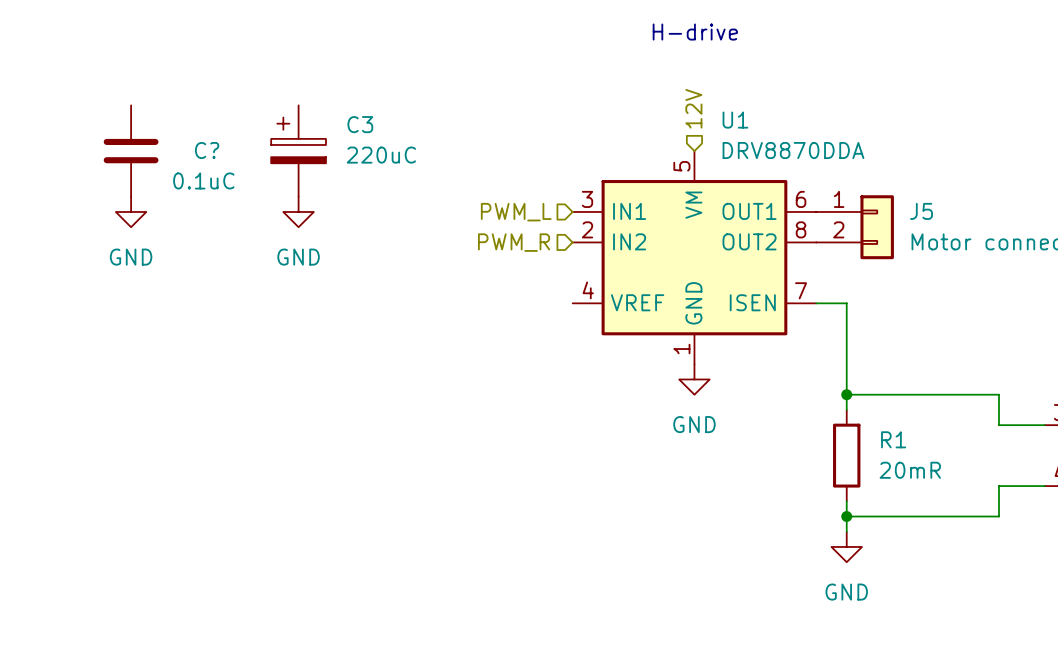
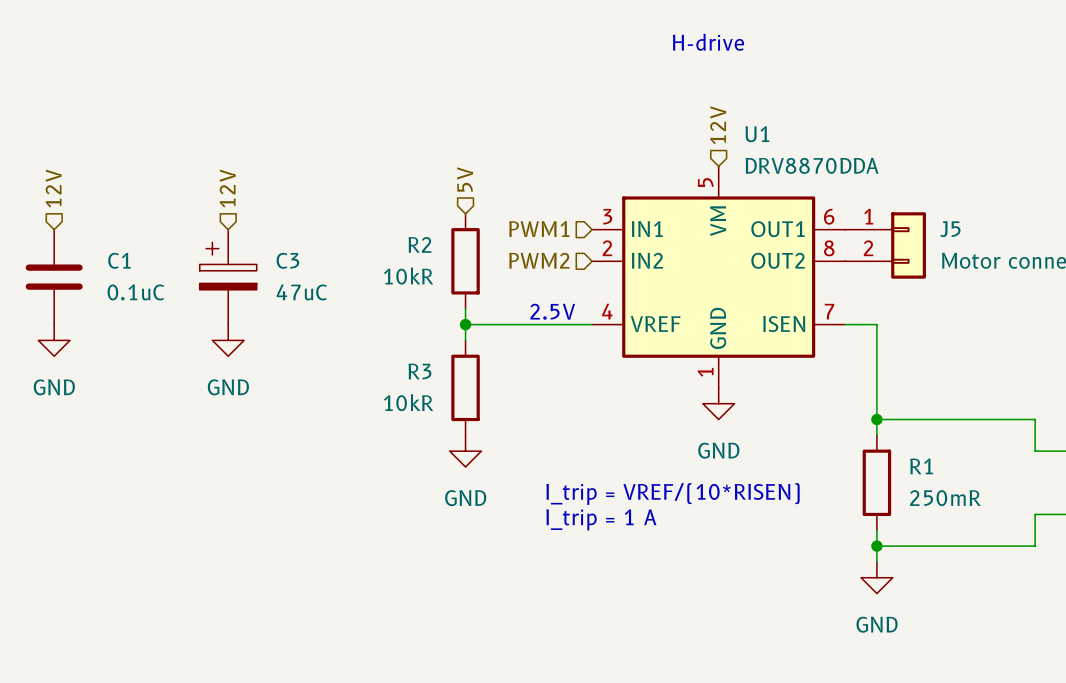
C3 name position: C3 (360, 124) -> C3 (287, 260)
C?: 0.1uC (131, 151) -> none
C3 position: (298, 151) -> (228, 277)
C3 value: 220uC (381, 155) -> 47uC (301, 292)
hierarchical label: none -> 5V (465, 179)
hierarchical label: none -> 12V (53, 188)
hierarchical label: none -> 12V (227, 188)
power symbol: GND (131, 211) -> none
power symbol: GND (298, 211) -> none
hierarchical label: PWM_L (516, 212) -> PWM1 (539, 229)
R2: none -> 10kR (465, 261)
hierarchical label: PWM_R (514, 242) -> PWM2 (539, 260)
C1: none -> 0.1uC (54, 277)
wire: none -> (465, 308) (465, 340)
text: none -> 2.5V (552, 311)
wire: none -> (465, 324) (592, 324)
junction: none -> (465, 324)
power symbol: none -> GND (54, 340)
power symbol: none -> GND (228, 340)
R3: none -> 10kR (465, 387)
power symbol: none -> GND (465, 451)
text: none -> I_trip = VREF/(10*RISEN) (672, 494)
R1 value: 20mR (910, 470) -> 250mR (945, 498)
text: none -> I_trip = 1 A (601, 519)

